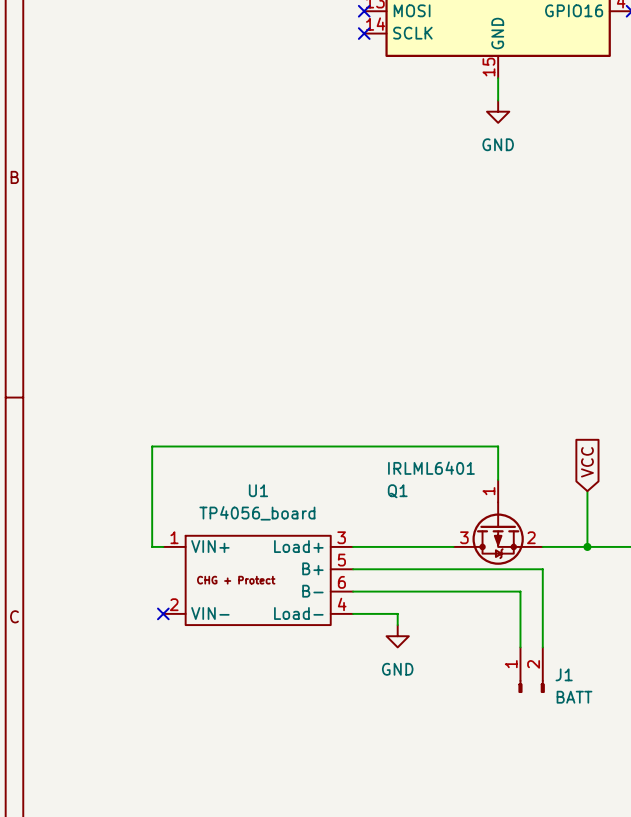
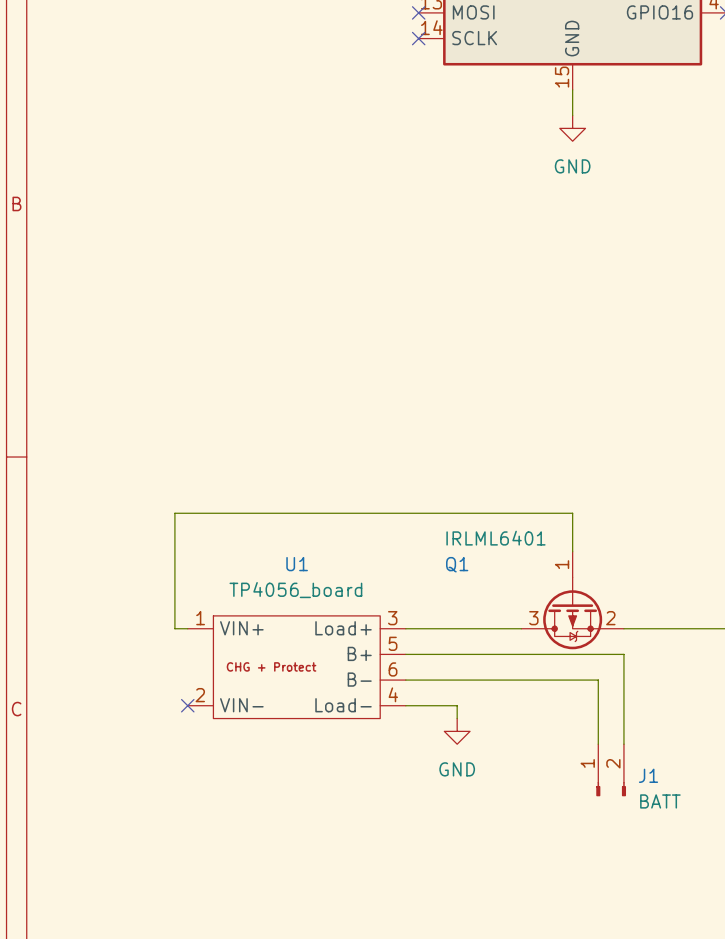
global label: VCC (587, 462) -> none
wire: (587, 491) (587, 546) -> none
junction: (587, 546) -> none

